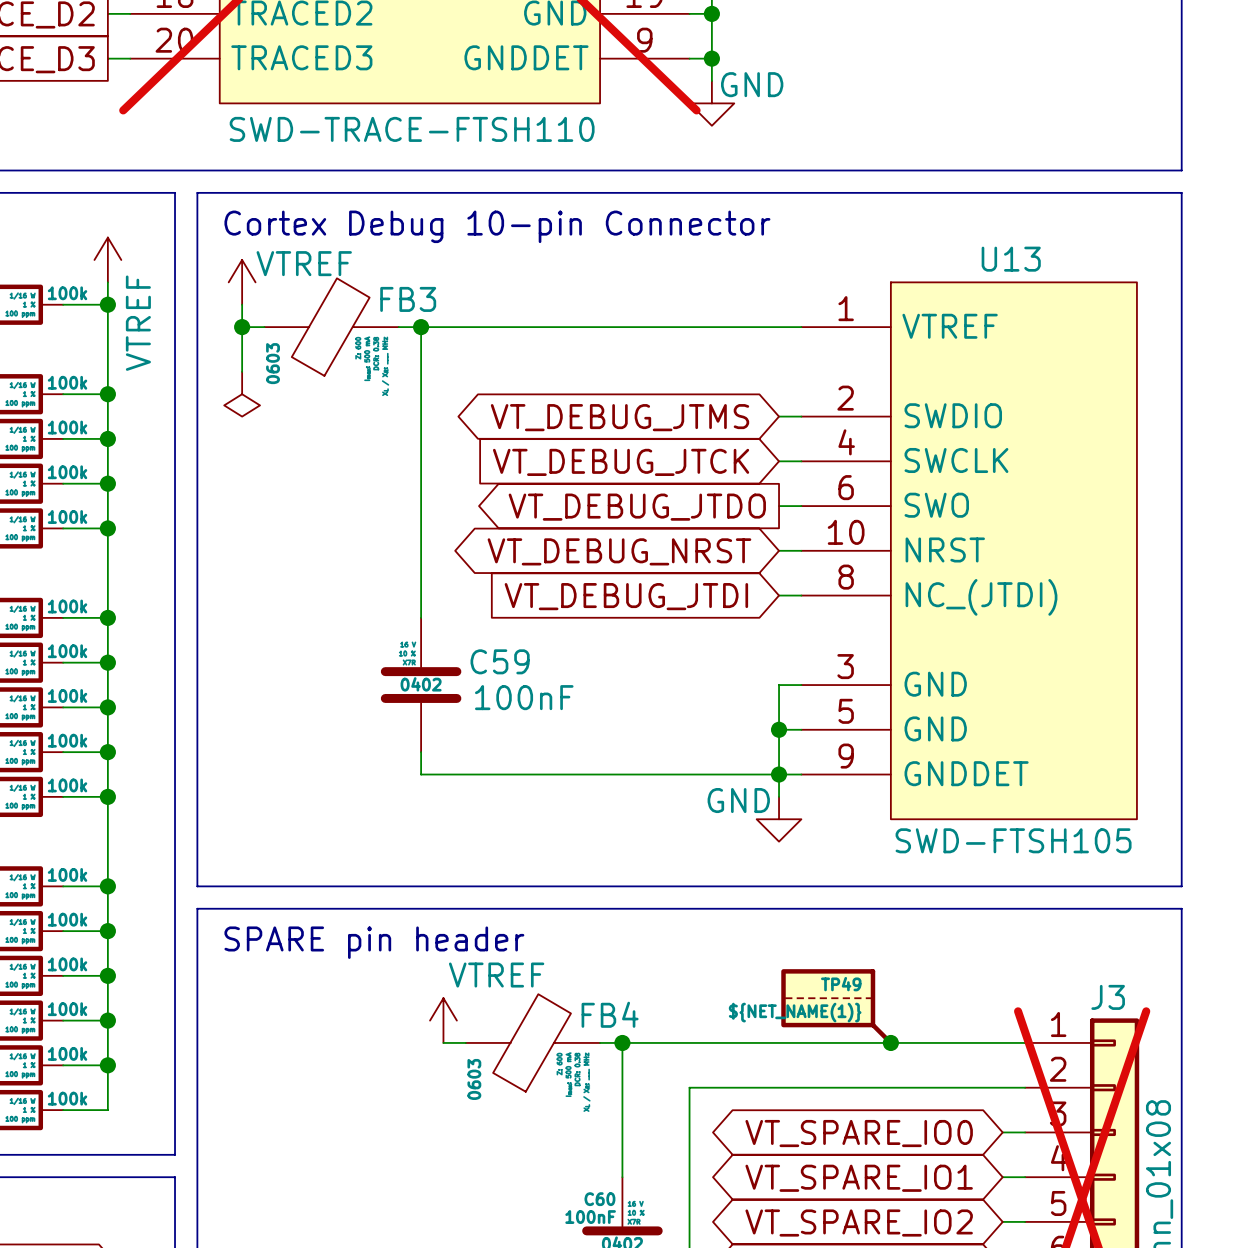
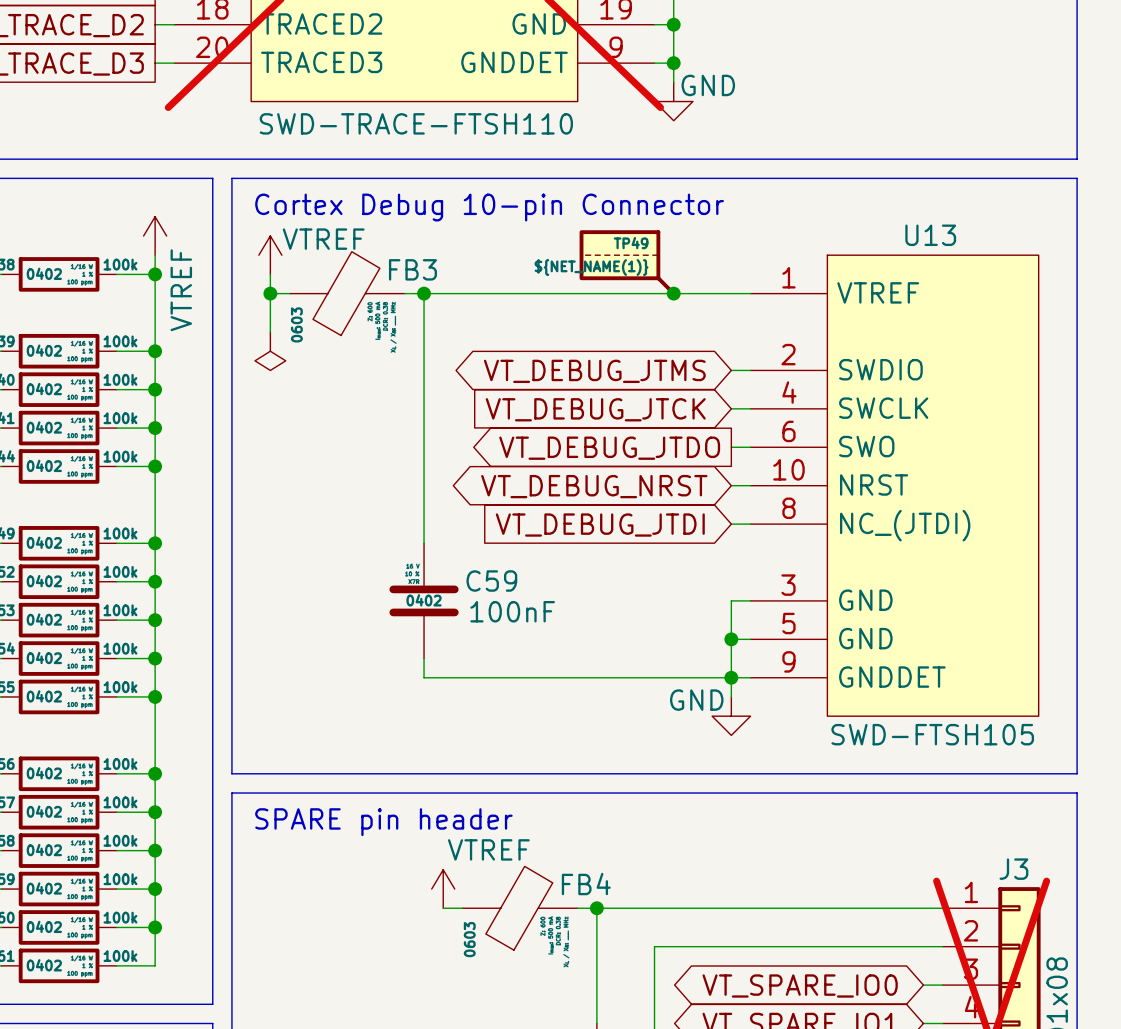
junction: none -> (673, 293)
TP49 position: (837, 1007) -> (627, 262)
junction: (890, 1042) -> none

